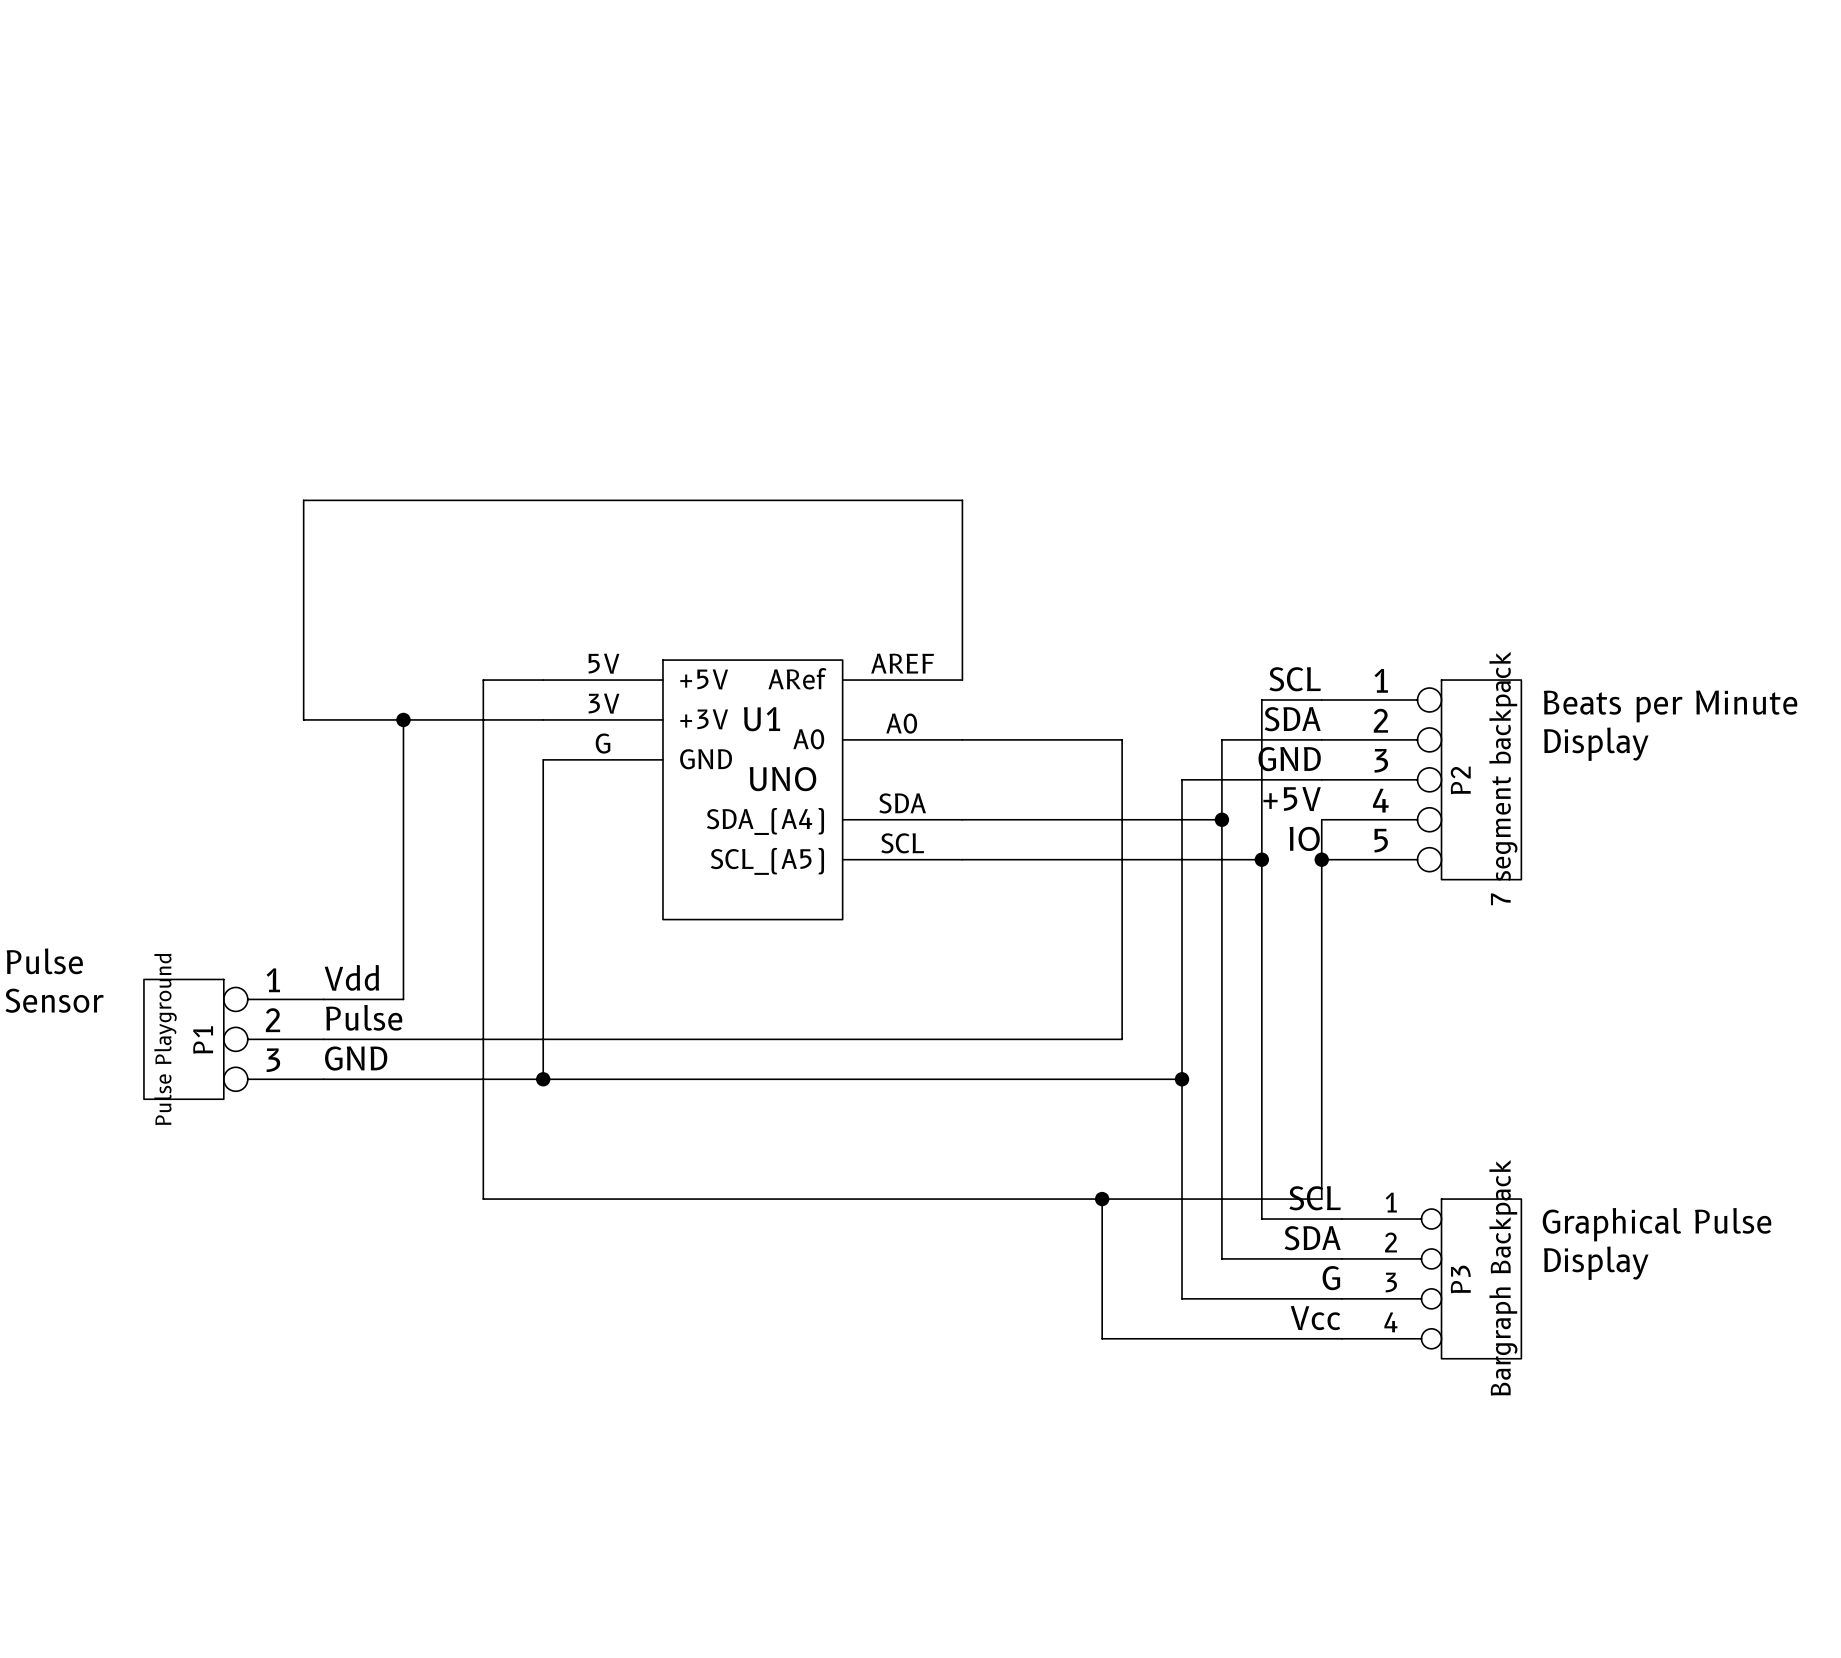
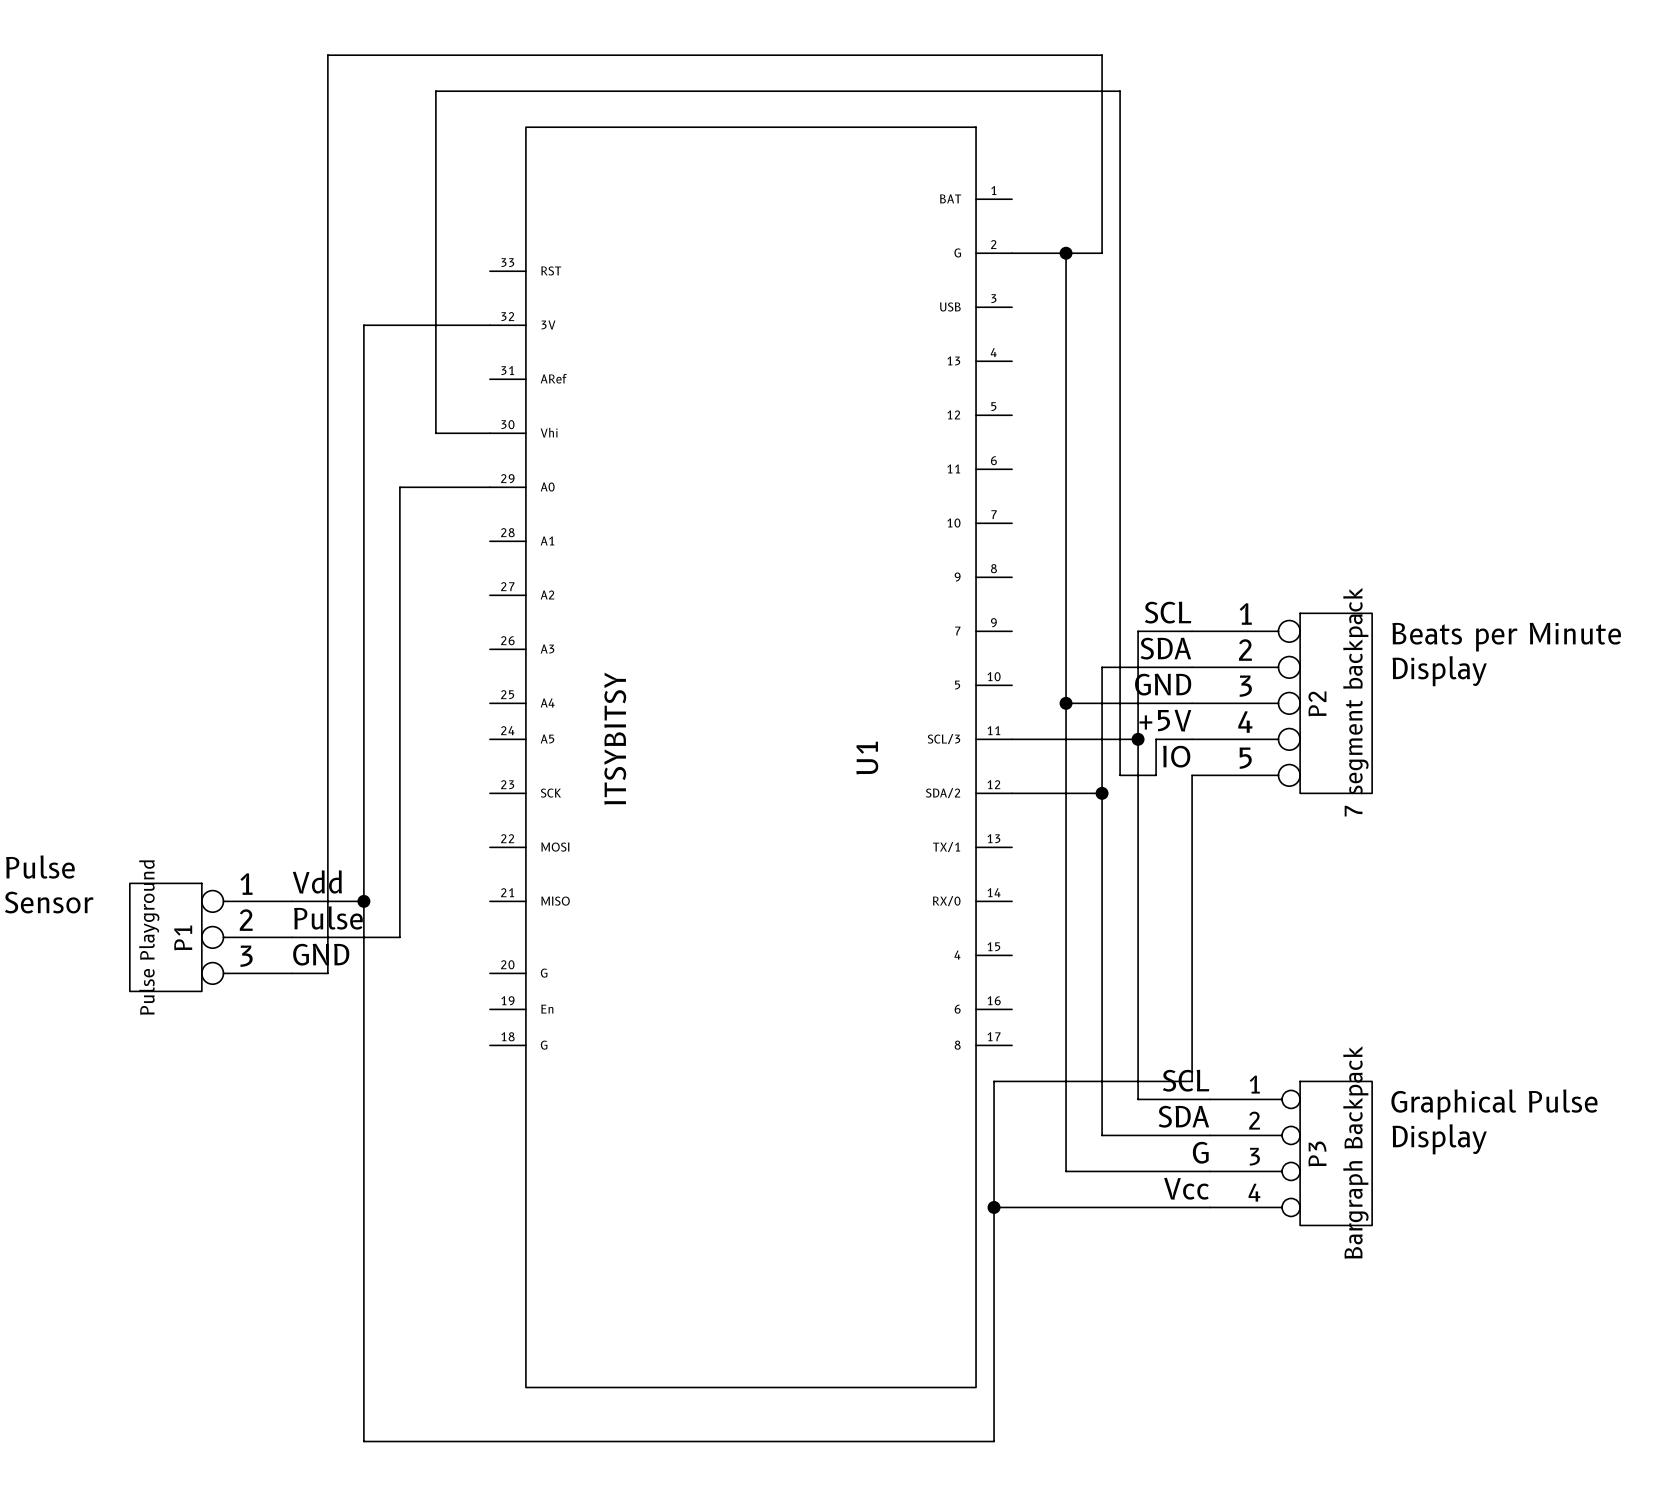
wire: none -> (1066, 253) (1066, 703)
junction: none -> (1066, 253)
wire: none -> (489, 325) (363, 325) (363, 649)
U1 symbol: [543, 660, 963, 920] -> [489, 127, 1013, 1388]
wire: (543, 680) (483, 680) (483, 1199) (1102, 1199) -> none
wire: (962, 680) (962, 500) (303, 500) (303, 719) (543, 719) -> none
junction: (403, 719) -> none
U1 name position: U1 (762, 719) -> U1 (867, 758)
wire: (962, 739) (1122, 739) (1122, 1039) (443, 1039) -> (489, 487) (399, 487) (399, 937)
wire: (543, 759) (543, 1079) -> none
U1 value: UNO (782, 779) -> ITSYBITSY (615, 738)
junction: none -> (1066, 703)
wire: (962, 819) (1122, 819) -> none
wire: none -> (1102, 739) (1138, 739)
junction: (1221, 819) -> none
junction: none -> (1138, 739)
wire: (1321, 819) (1321, 859) -> (1192, 739) (1156, 739) (1156, 775) (1138, 775)
wire: (962, 859) (1241, 859) -> (489, 433) (435, 433) (435, 91) (1120, 91) (1120, 775)
junction: (1261, 859) -> none
junction: (1321, 859) -> none
wire: none -> (1012, 793) (1102, 793)
junction: none -> (1102, 793)
wire: none -> (363, 901) (363, 1441) (994, 1441) (994, 1207)
junction: none -> (363, 901)
wire: (363, 1079) (1182, 1079) -> (327, 973) (327, 55) (1102, 55) (1102, 253) (1012, 253)
junction: (543, 1079) -> none
junction: (1182, 1079) -> none
junction: (1102, 1199) -> none
junction: none -> (994, 1207)

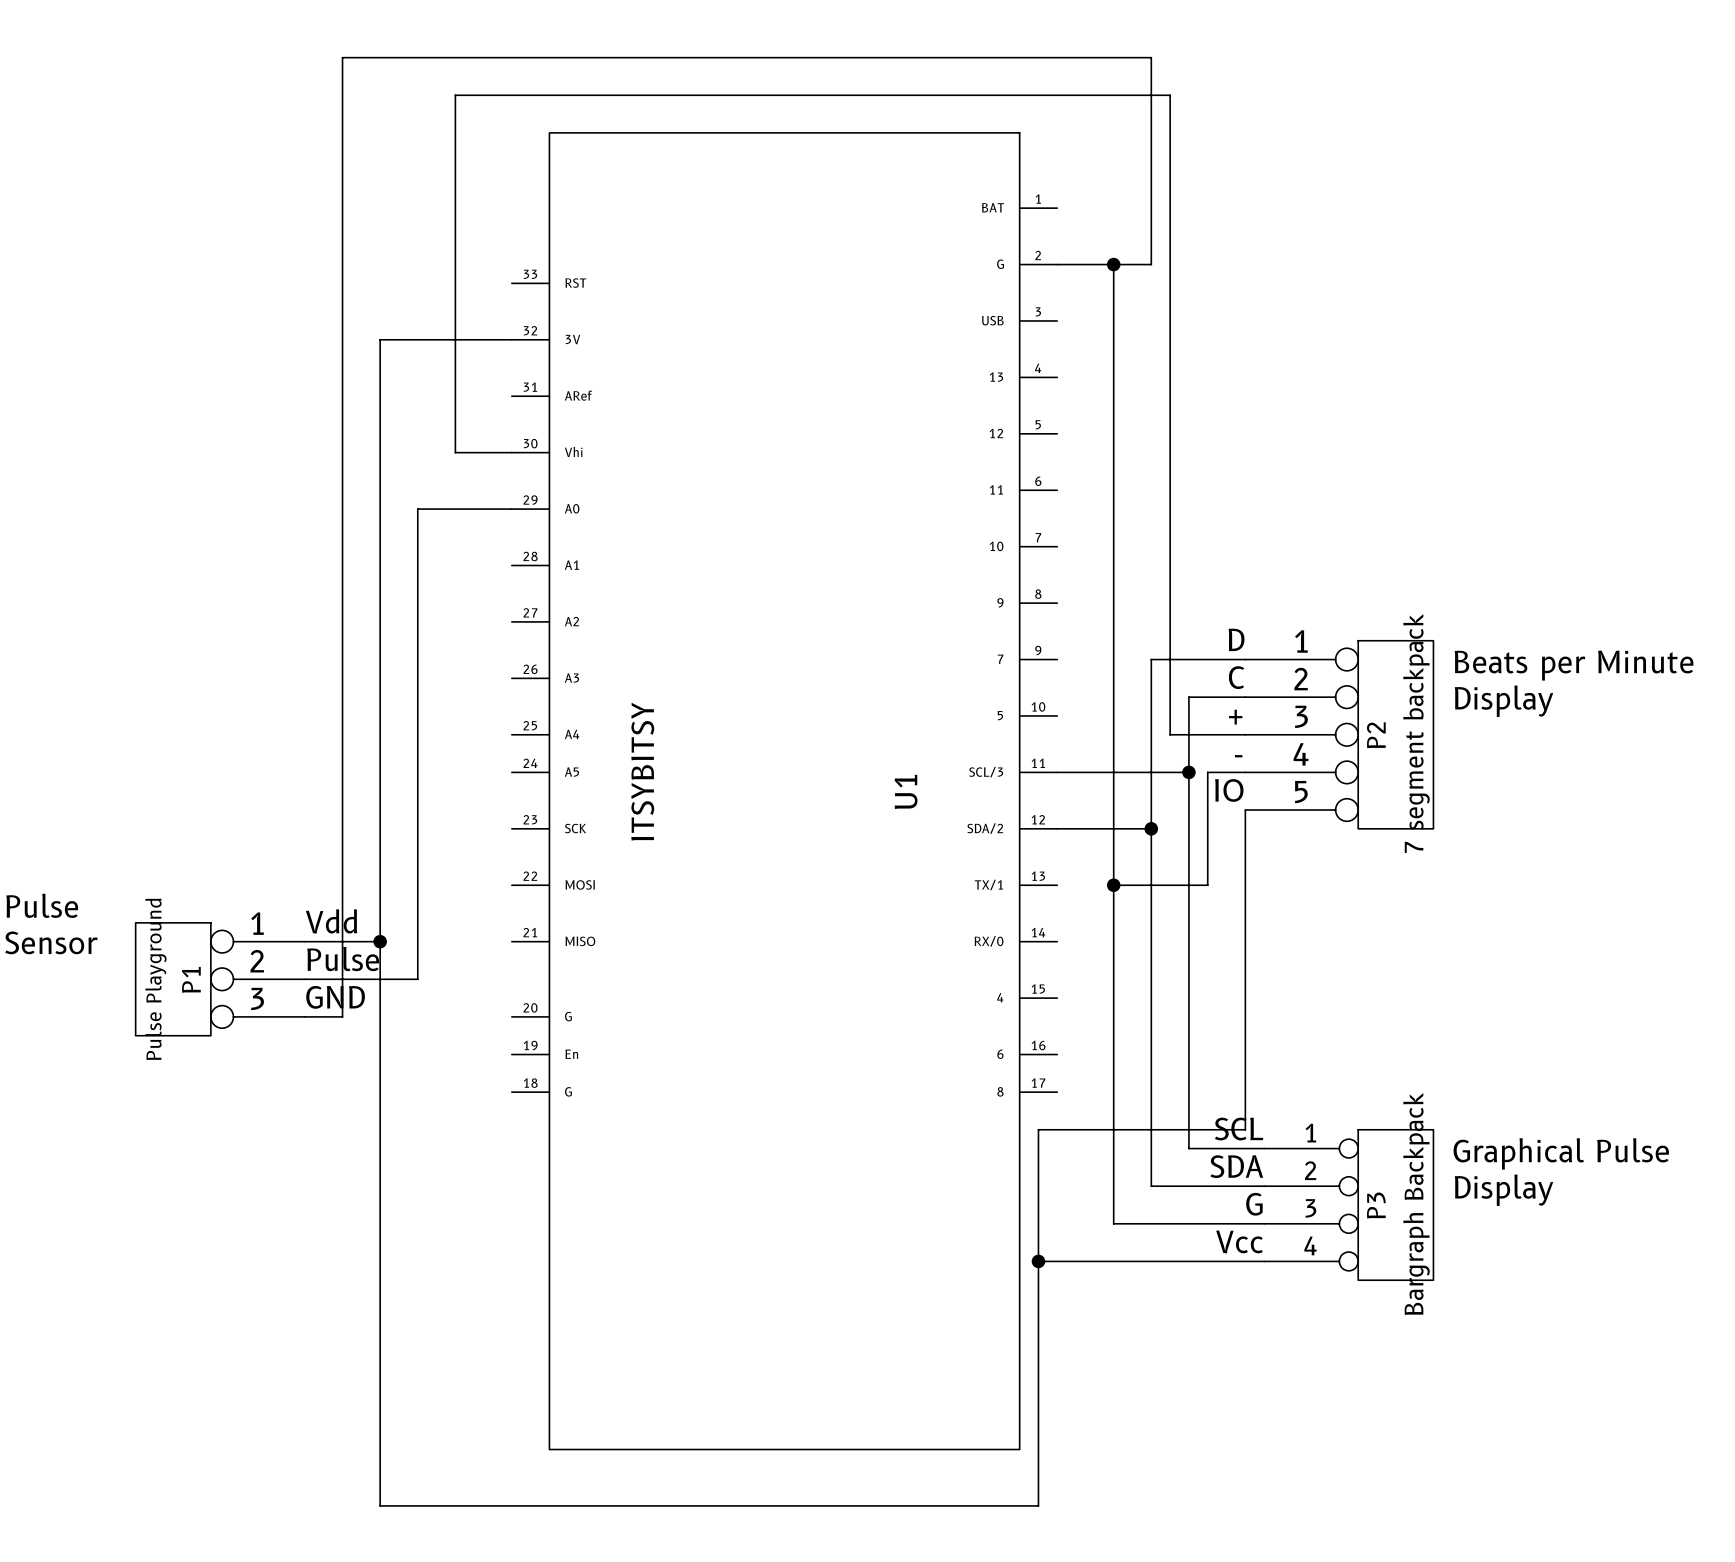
label: SCL (1168, 612) -> D (1236, 639)
wire: (1138, 631) (1138, 667) (1102, 667) -> (1188, 659) (1151, 659) (1151, 697)
label: SDA (1165, 648) -> C (1236, 677)
label: GND (1163, 684) -> + (1235, 717)
wire: (1066, 703) (1120, 703) (1120, 775) (1156, 775) -> (1113, 885) (1207, 885) (1207, 810)
junction: (1066, 703) -> none
label: +5V (1165, 720) -> - (1238, 756)
junction: none -> (1113, 885)

